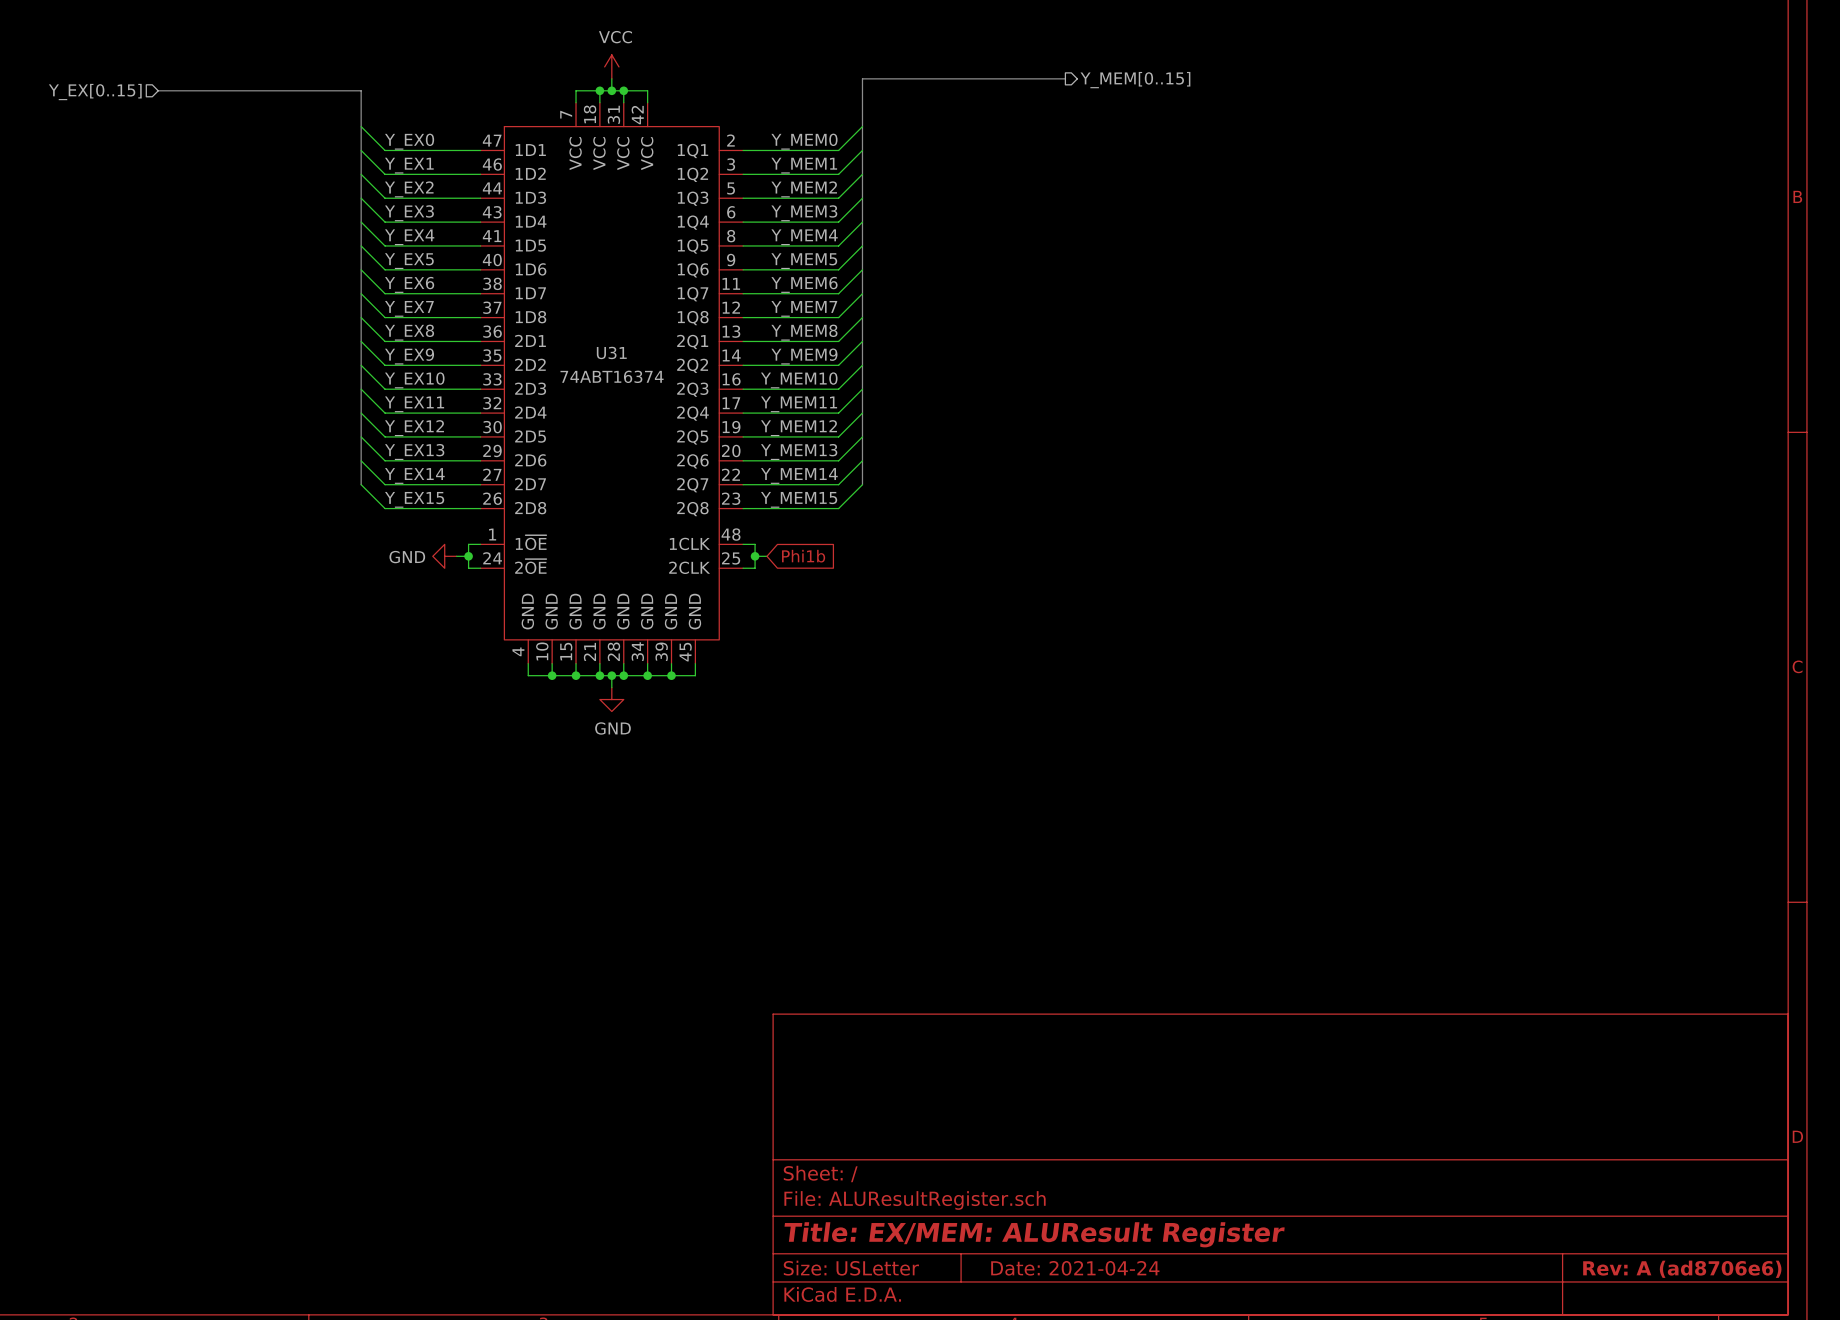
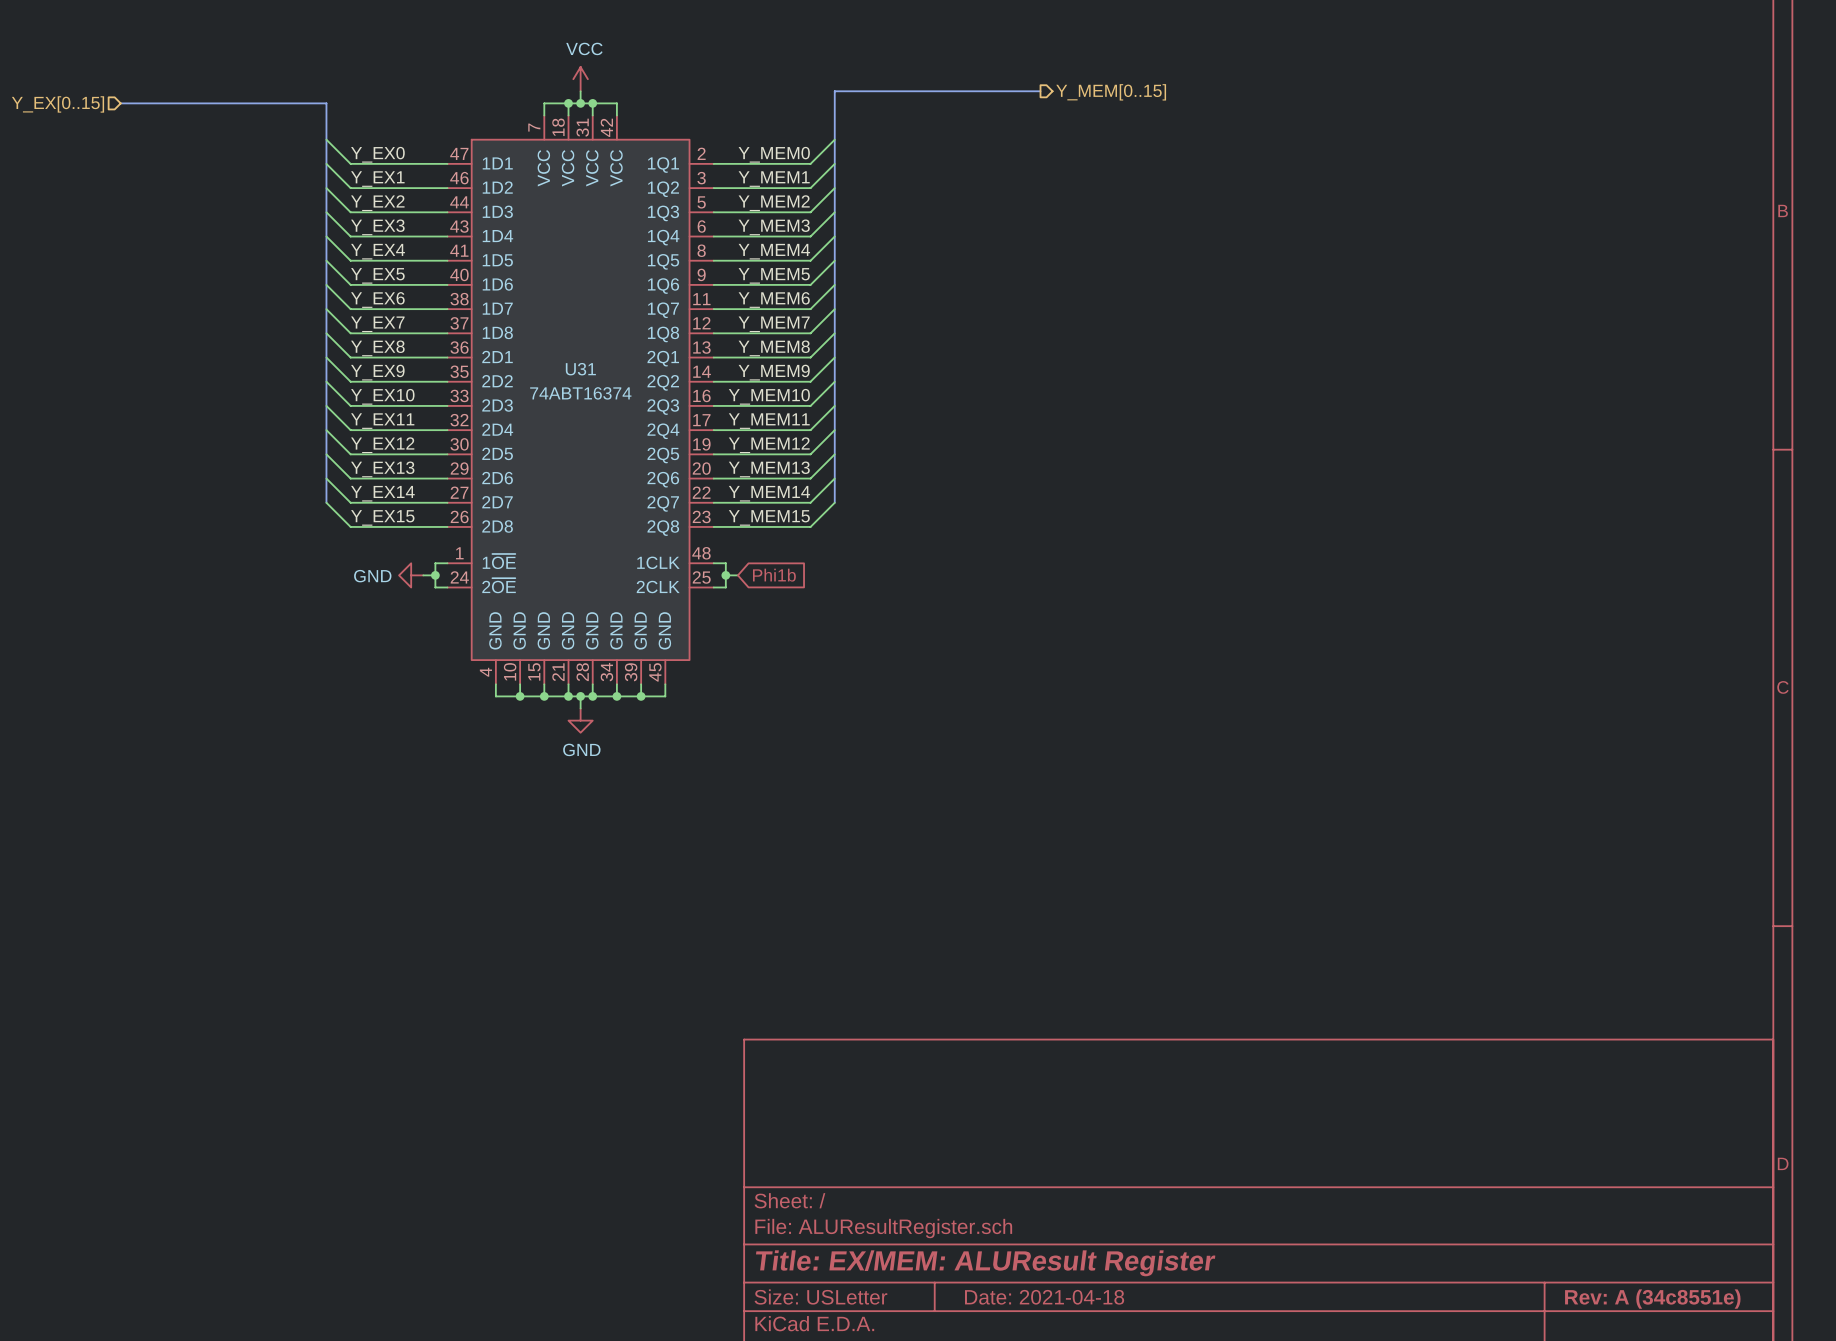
title block: Date: 2021-04-24 (1075, 1268) -> Date: 2021-04-18 (1044, 1297)
title block: Rev: A (ad8706e6) (1682, 1269) -> Rev: A (34c8551e) (1652, 1299)

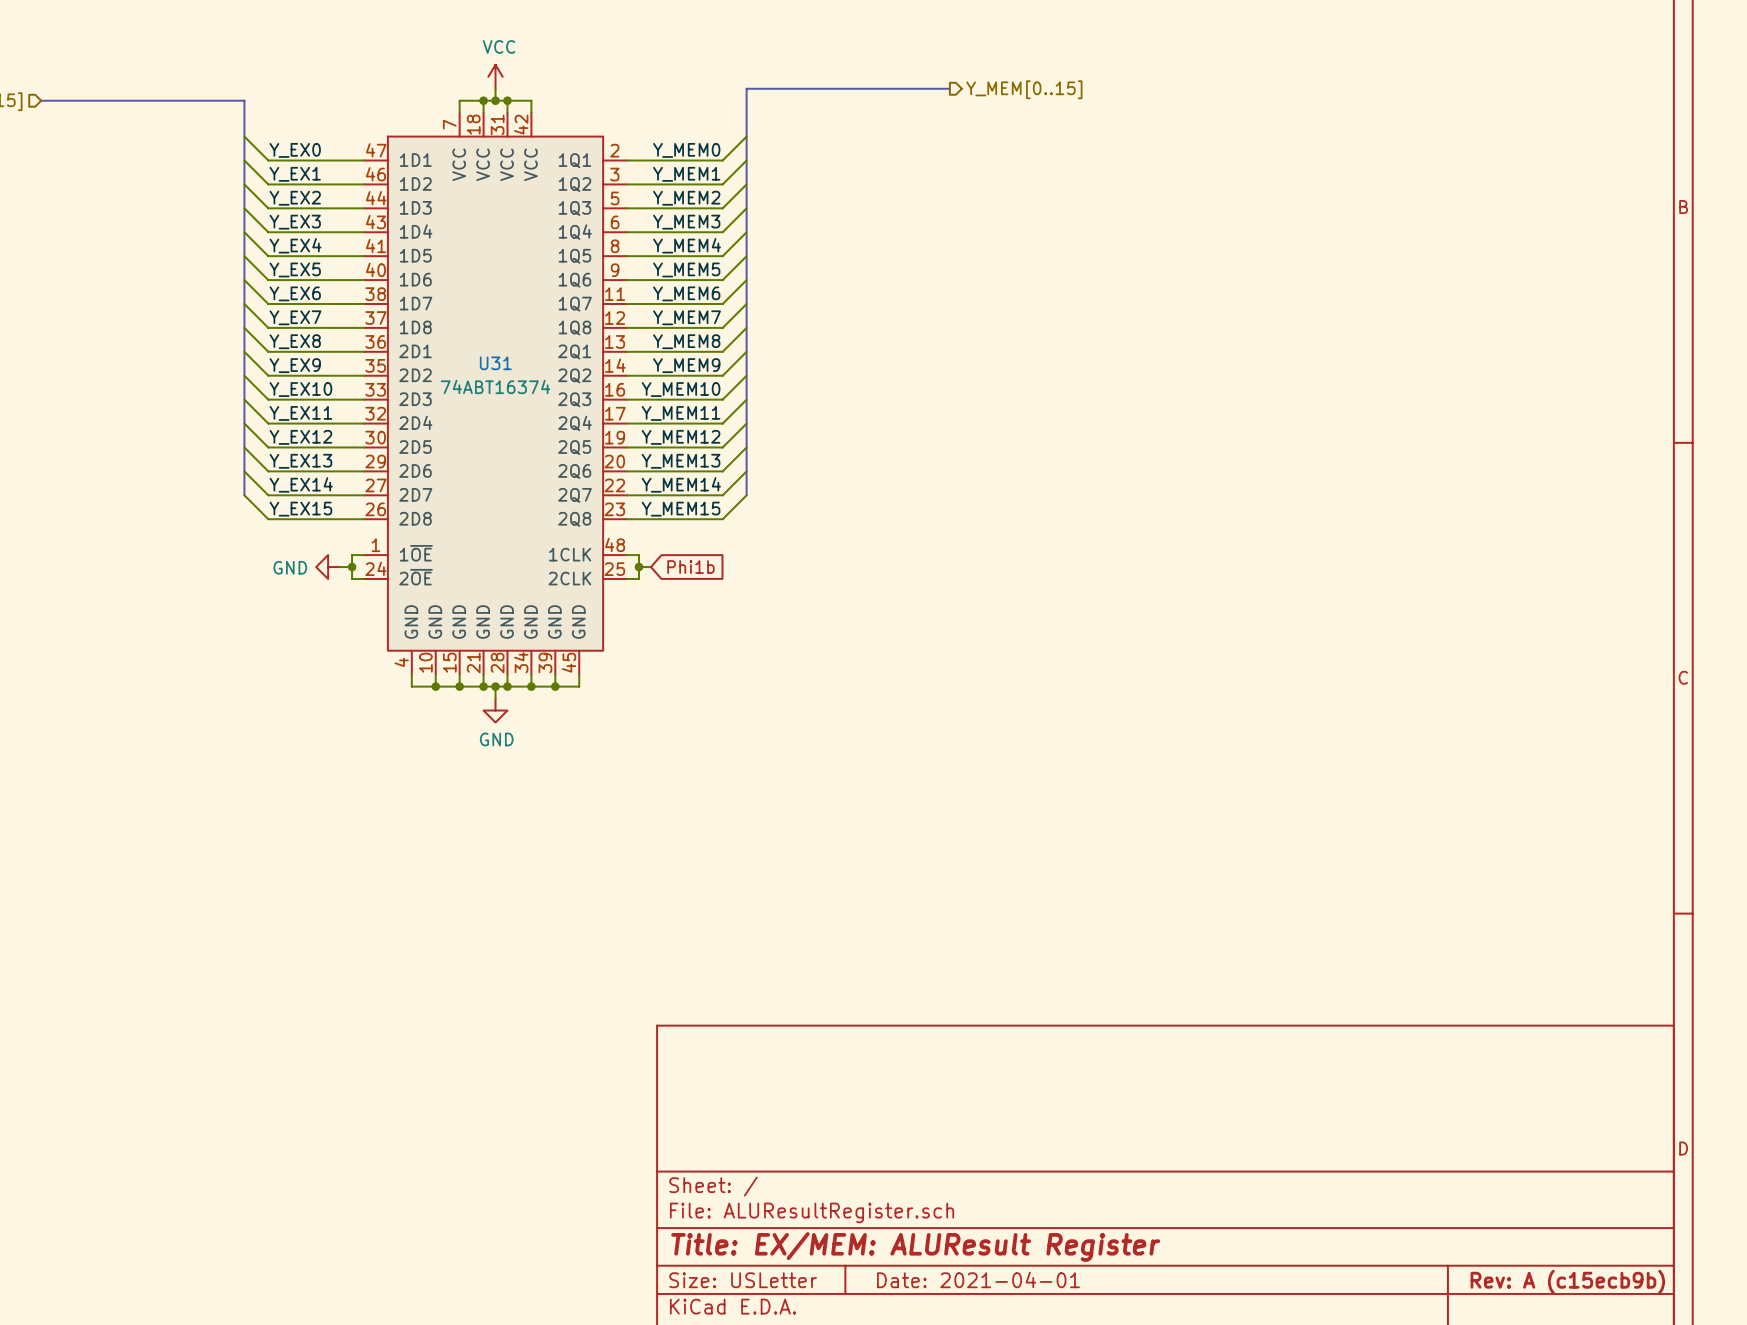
title block: Date: 2021-04-18 (1044, 1297) -> Date: 2021-04-01 (978, 1279)
title block: Rev: A (34c8551e) (1652, 1299) -> Rev: A (c15ecb9b) (1567, 1281)

